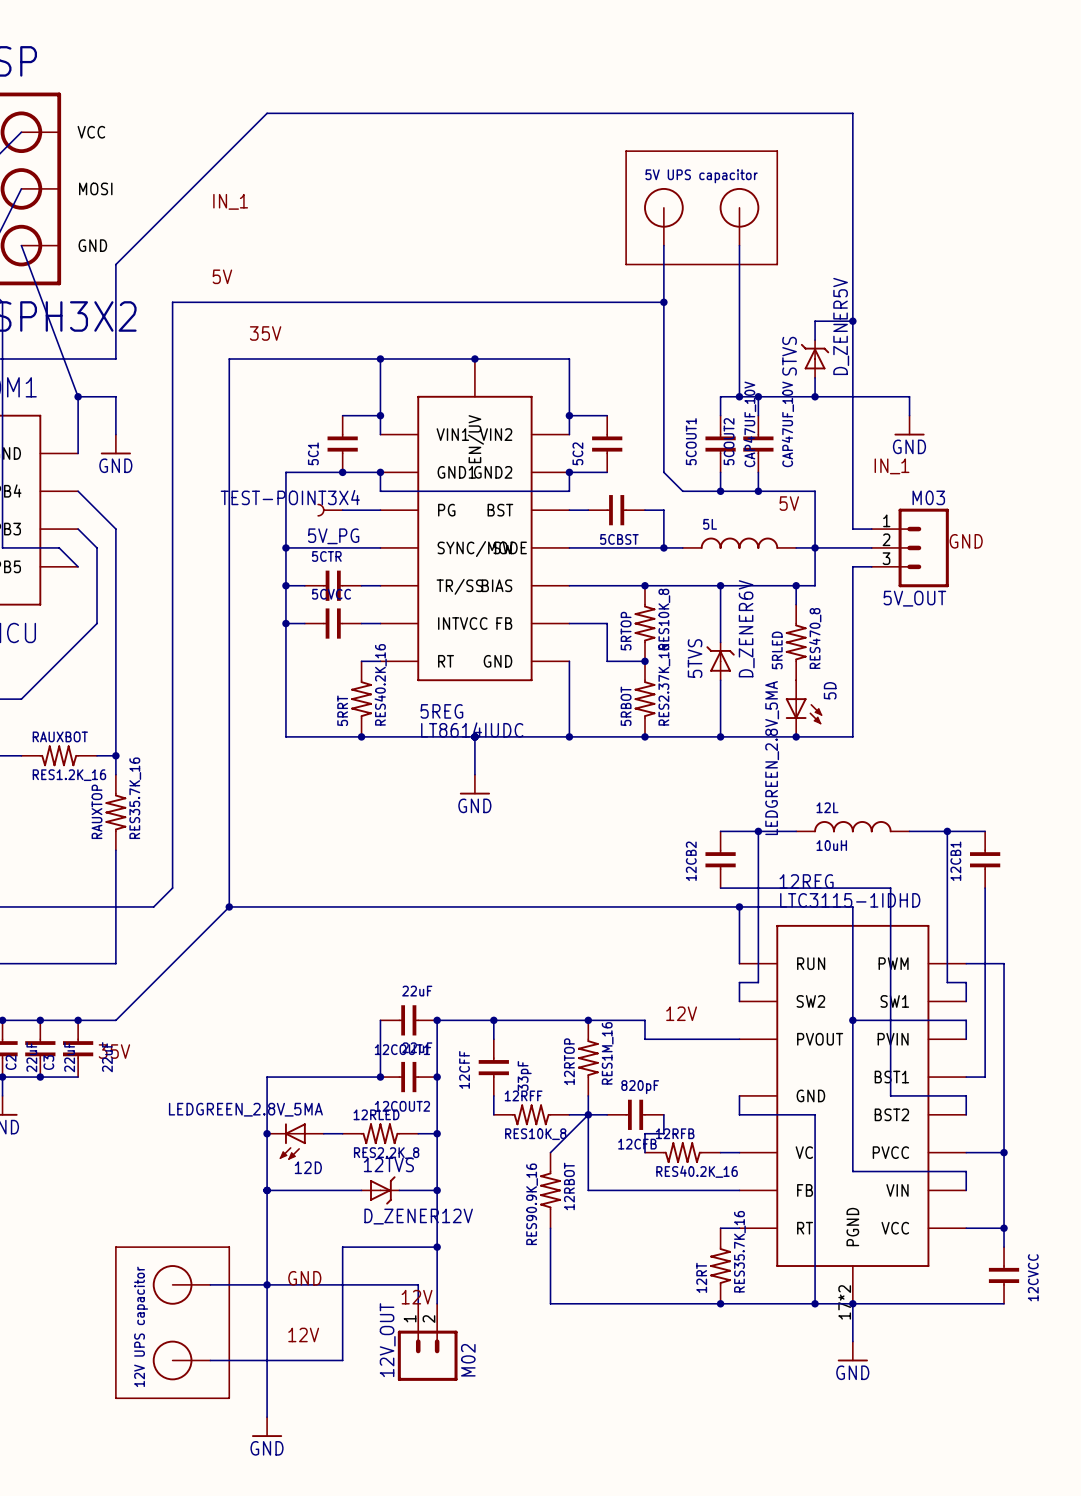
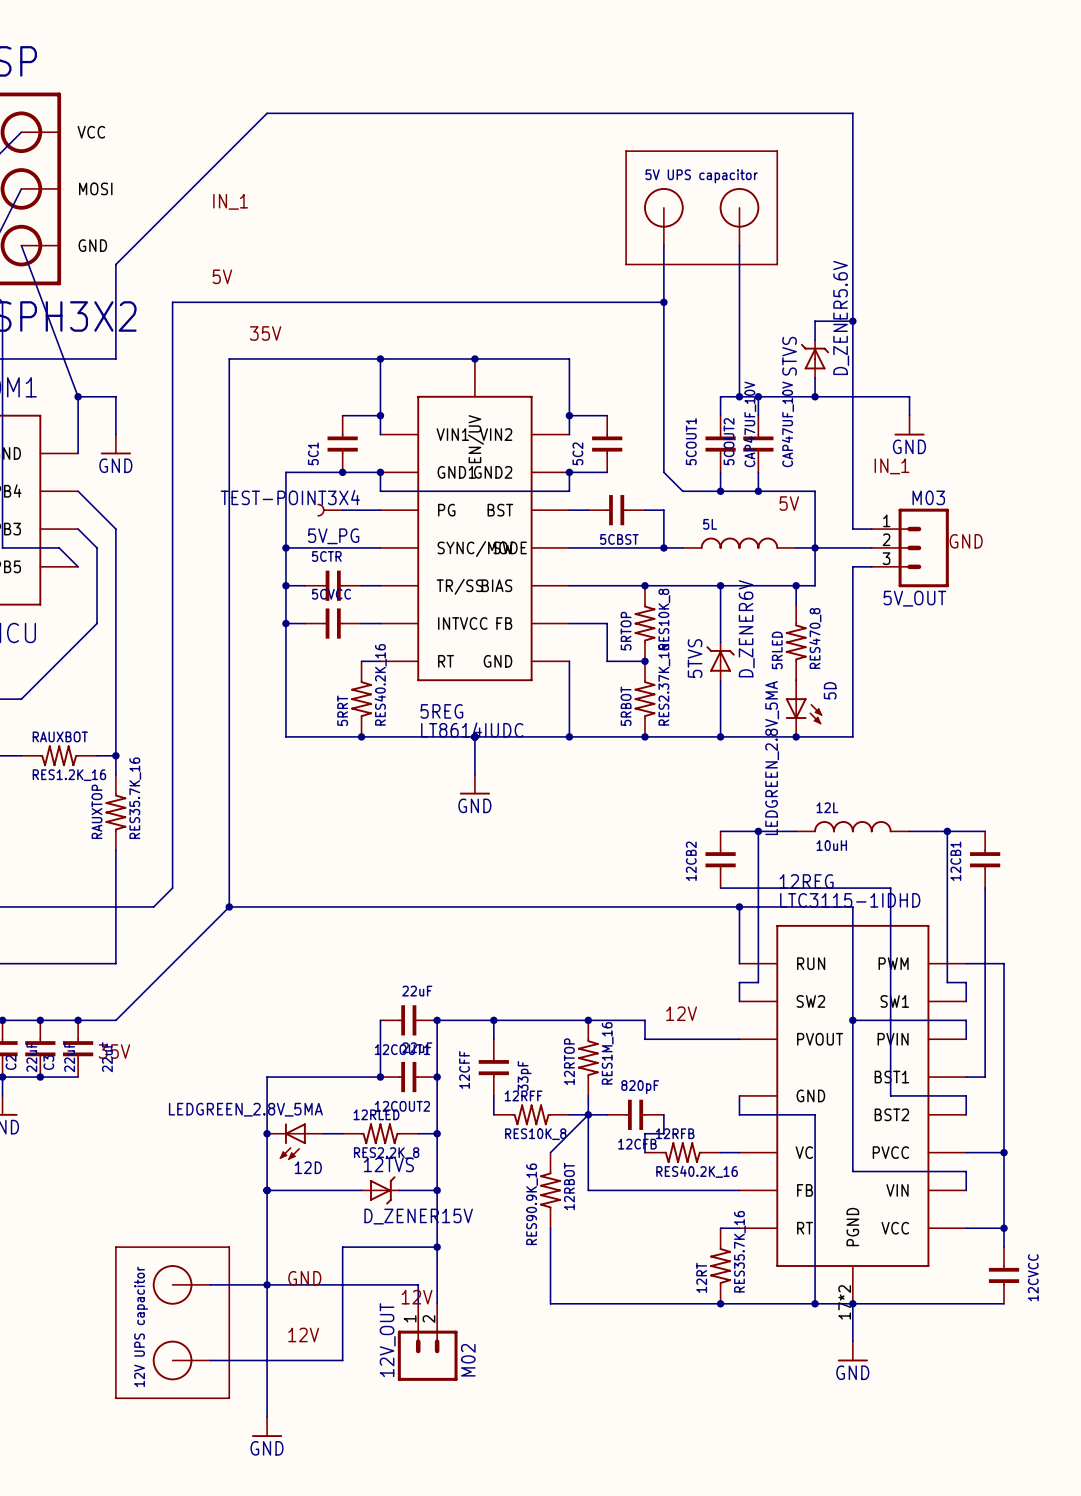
STVS value: D_ZENER5V (841, 326) -> D_ZENER5.6V (841, 317)
12TVS value: D_ZENER12V (418, 1216) -> D_ZENER15V (418, 1216)

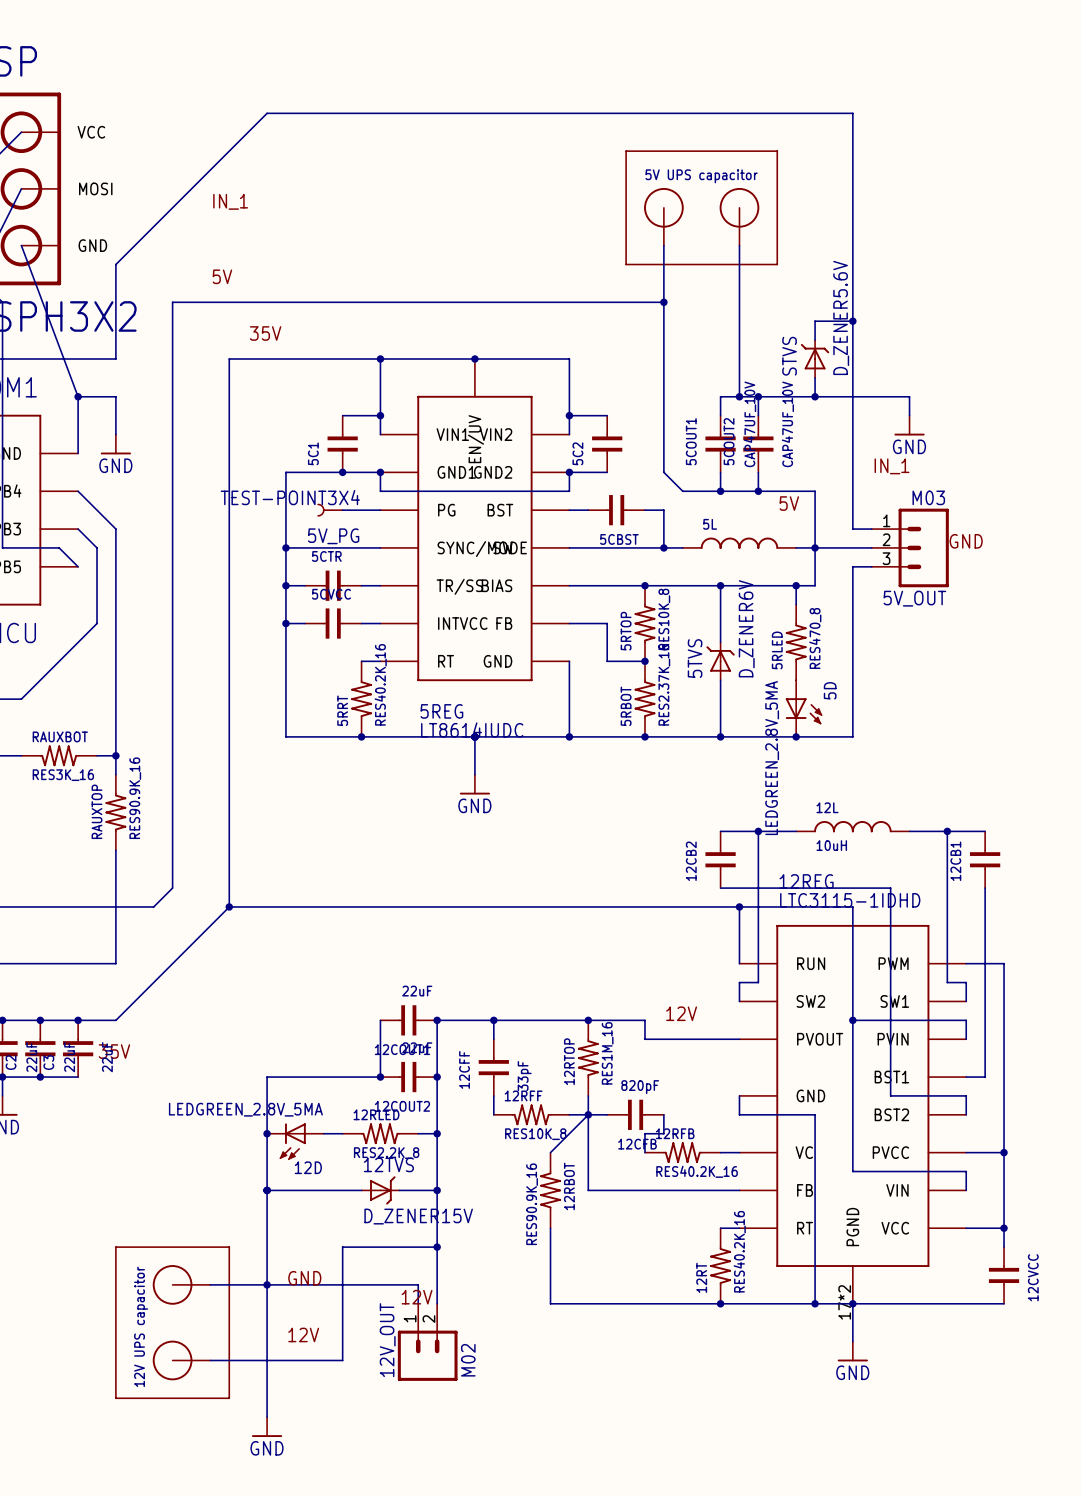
RAUXBOT value: RES1.2K_16 (69, 775) -> RES3K_16 (63, 775)
RAUXTOP value: RES35.7K_16 (135, 798) -> RES90.9K_16 (135, 798)
12RT value: RES35.7K_16 (739, 1251) -> RES40.2K_16 (739, 1251)

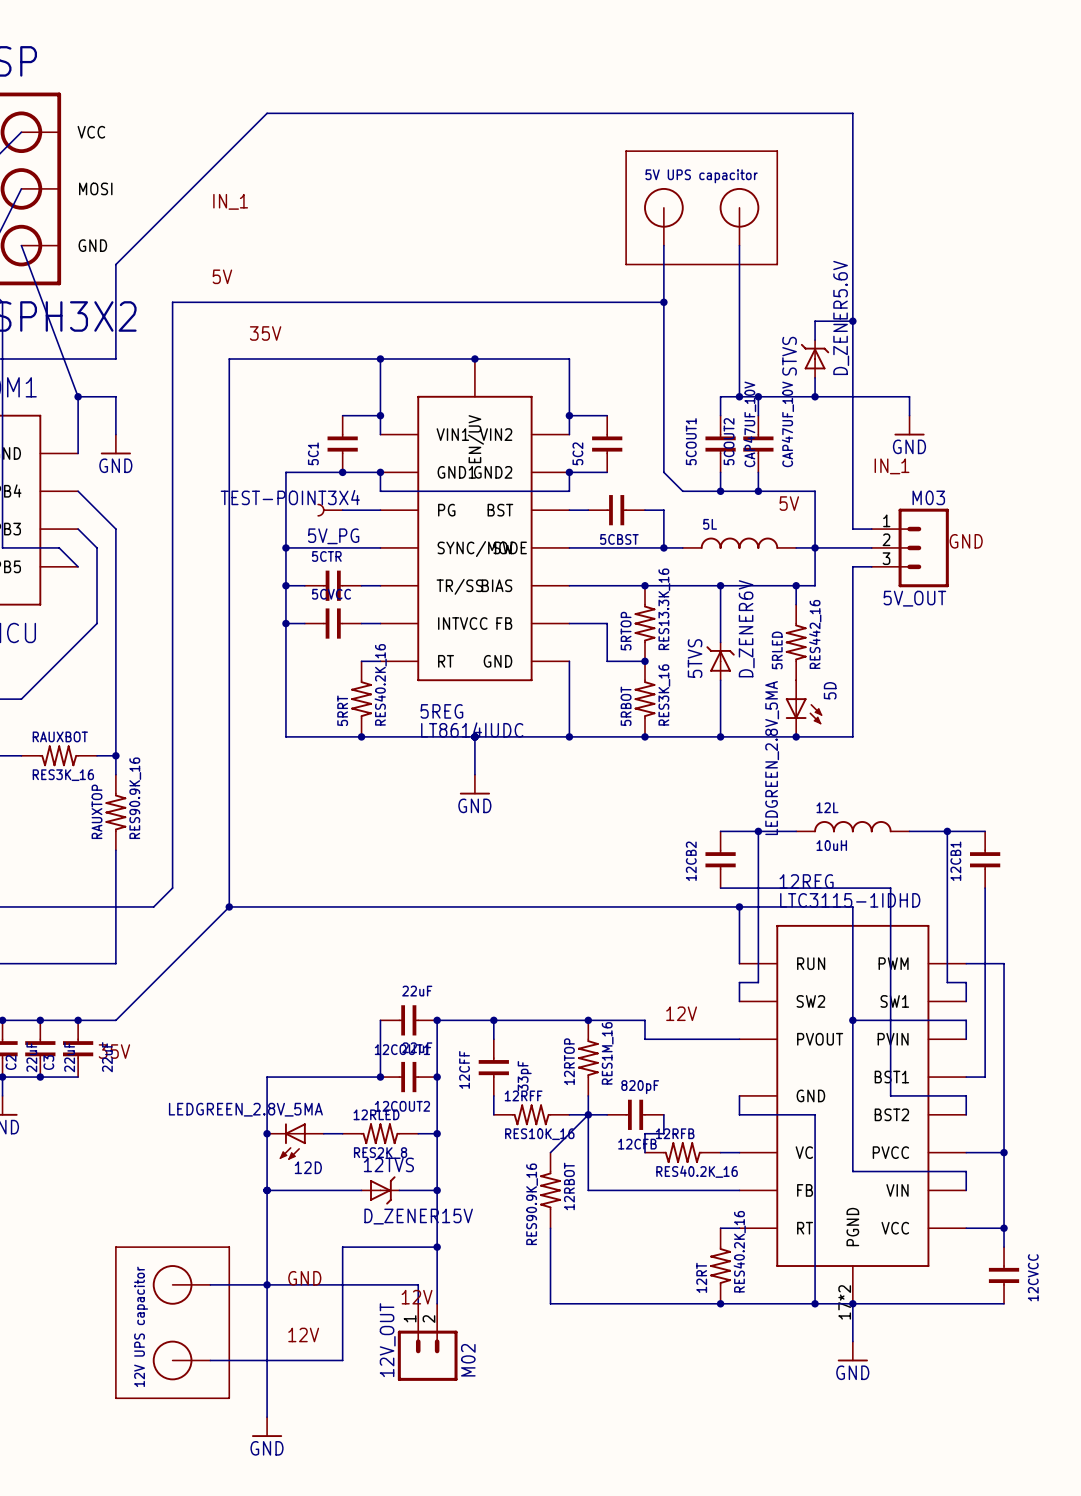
5RTOP value: RES10K_8 (664, 619) -> RES13.3K_16 (664, 609)
5RLED value: RES470_8 (815, 638) -> RES442_16 (815, 634)
5RBOT value: RES2.37K_16 (664, 684) -> RES3K_16 (664, 694)
12RFF value: RES10K_8 (535, 1134) -> RES10K_16 (539, 1134)
12RLED value: RES2.2K_8 (386, 1153) -> RES2K_8 (380, 1153)

